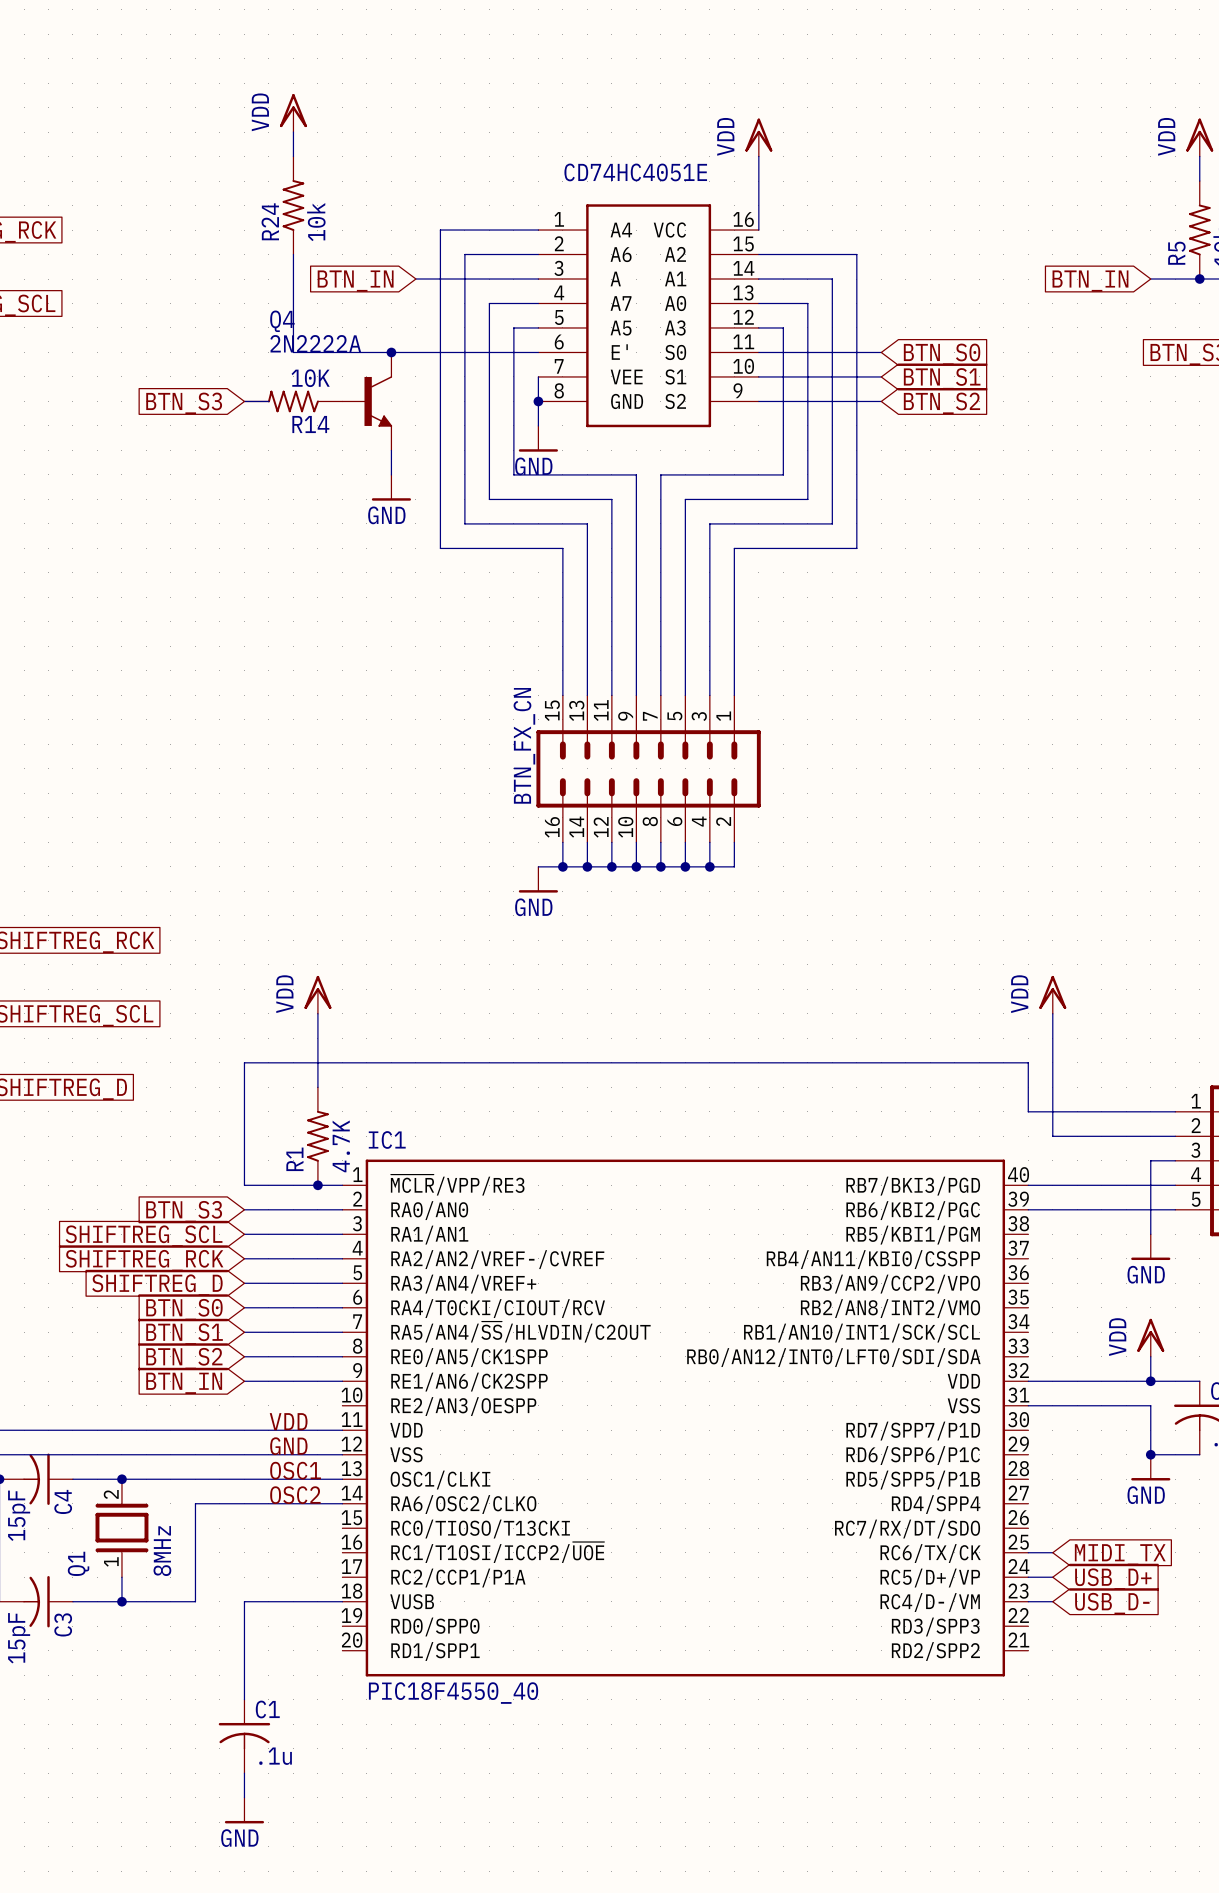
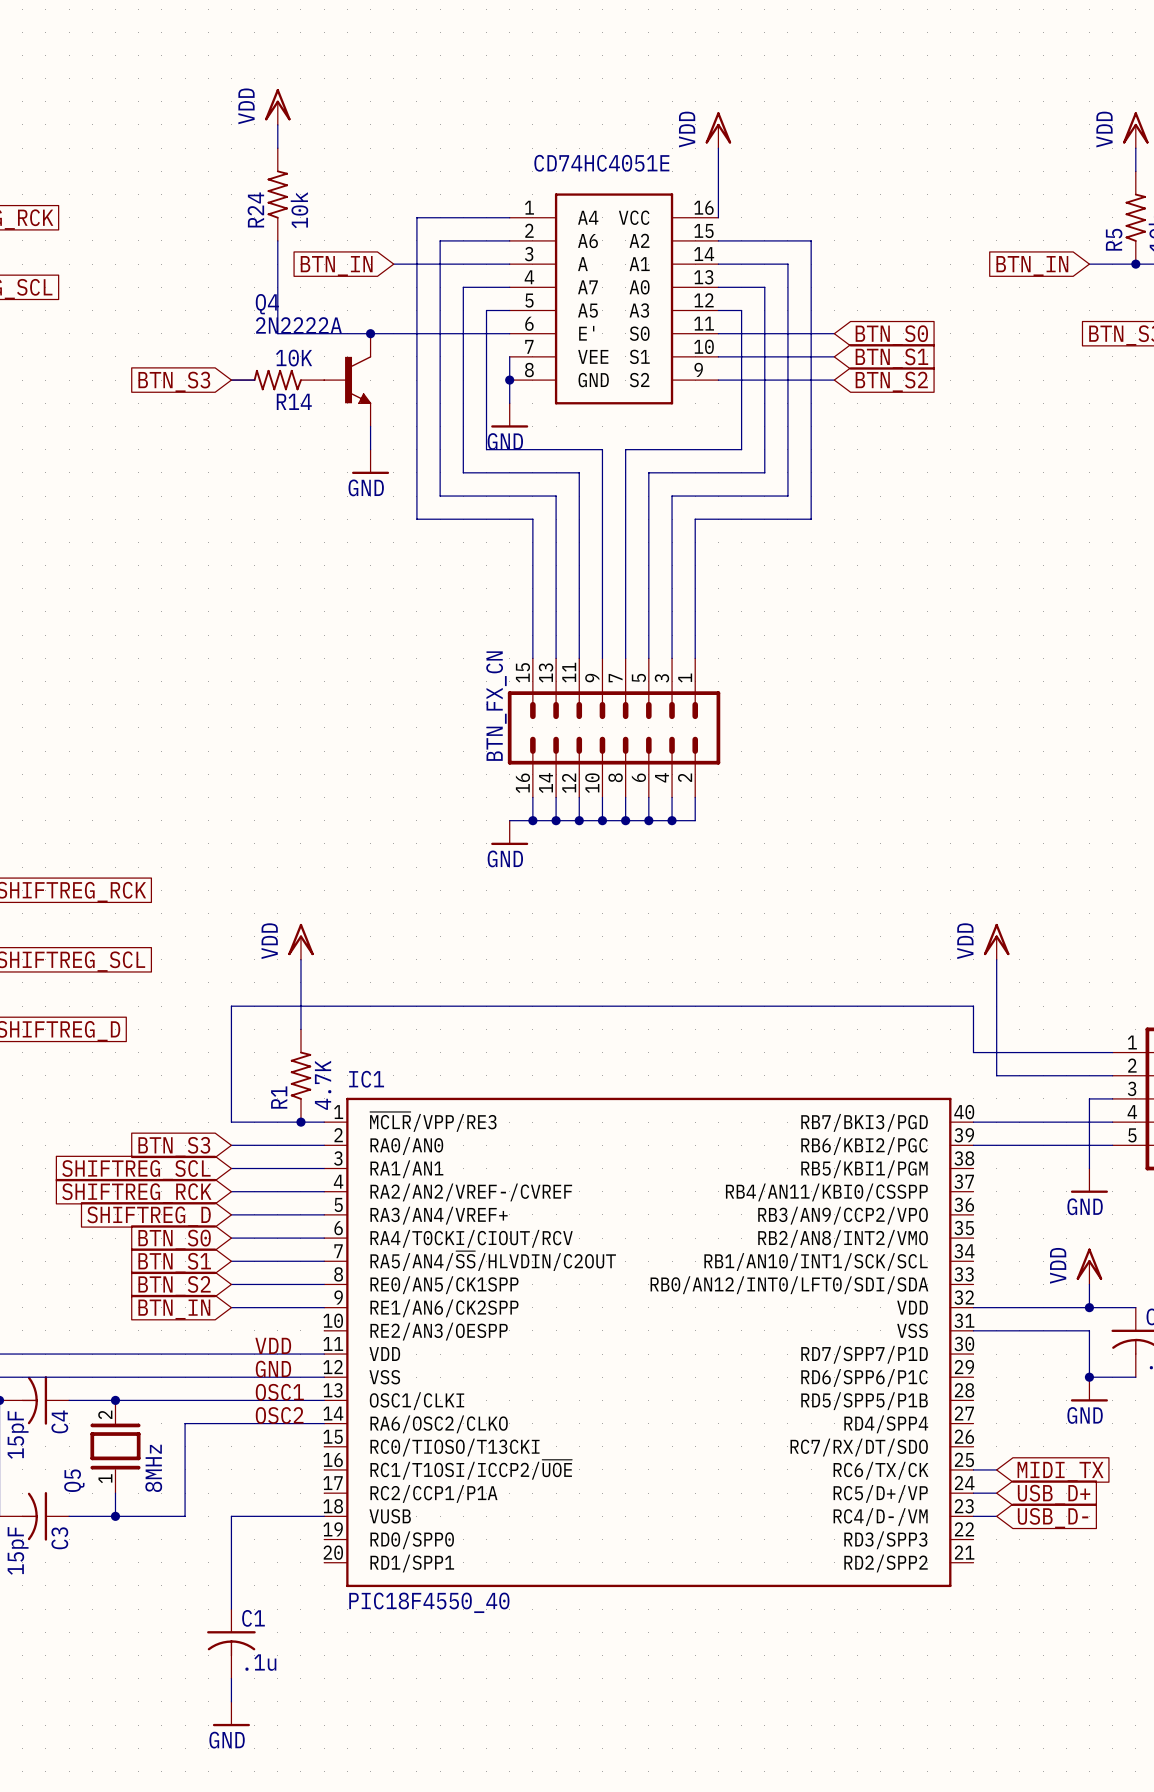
Q1 name: Q1 (78, 1563) -> Q5 (74, 1480)

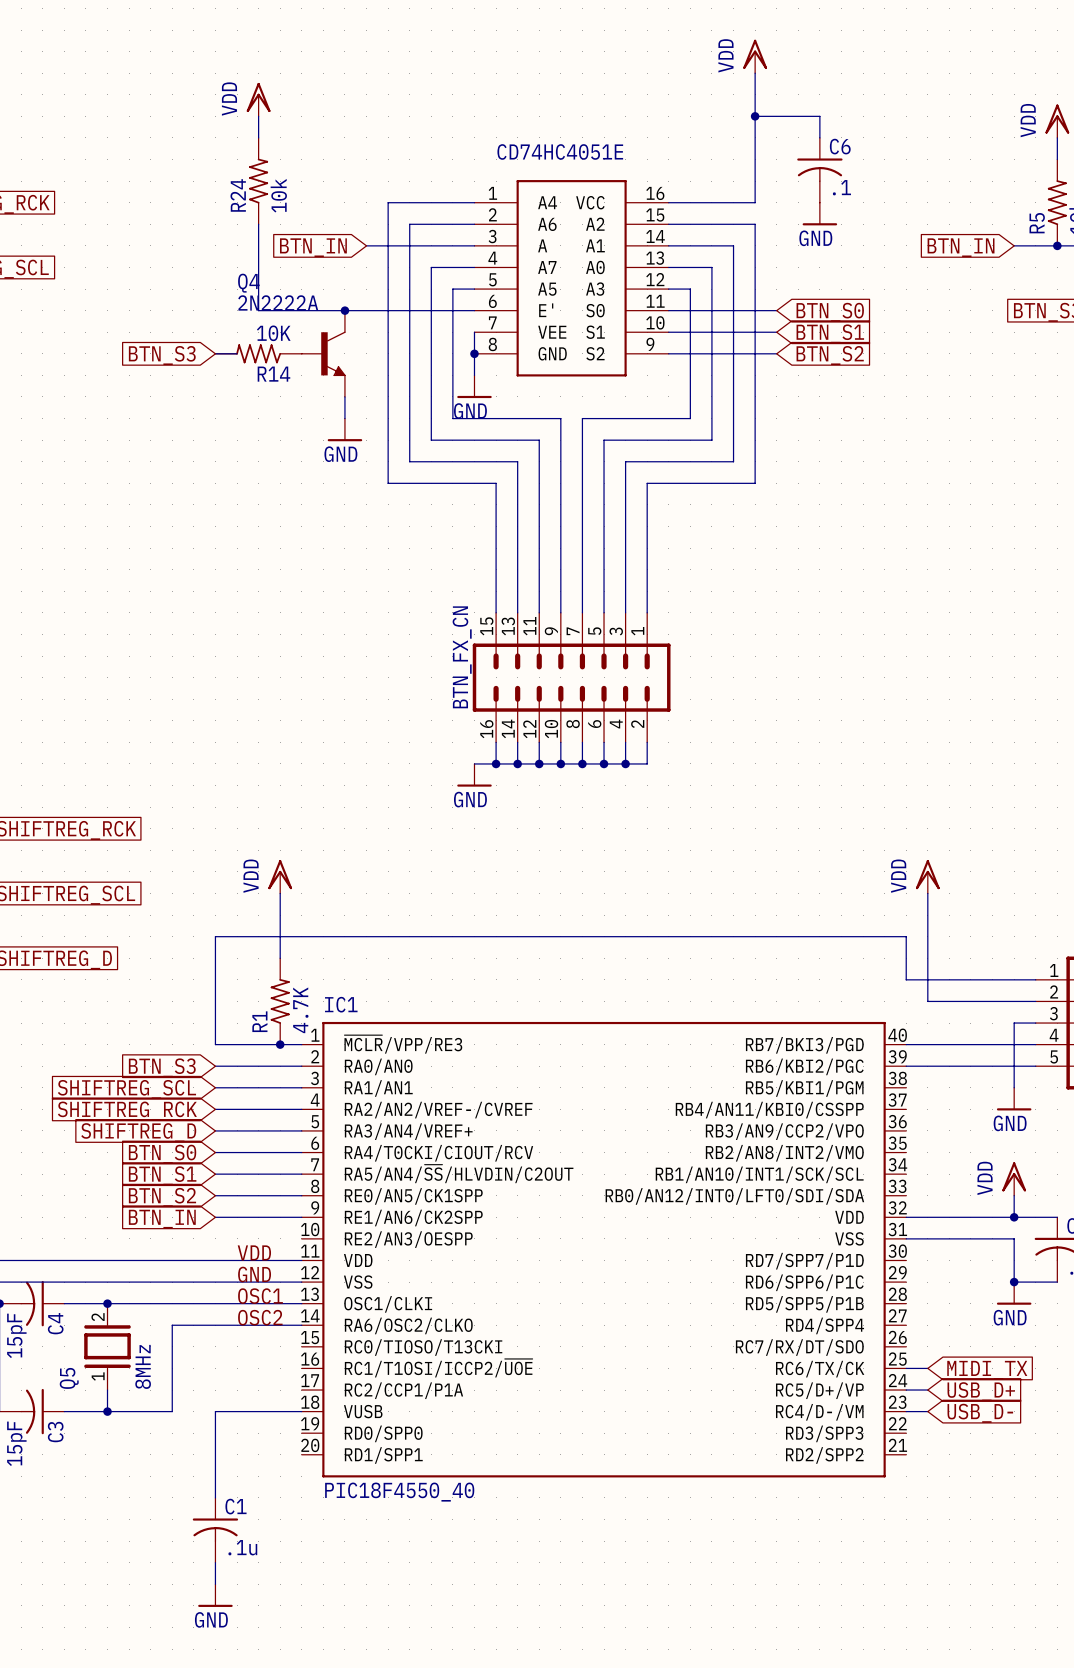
wire: none -> (755, 116) (819, 116) (819, 137)
junction: none -> (755, 116)
power symbol position: VDD (718, 130) -> VDD (755, 56)
wire: (718, 148) (718, 217) -> (755, 73) (755, 202) (668, 202)
C6: none -> .1 (819, 170)
power symbol: none -> GND (819, 214)

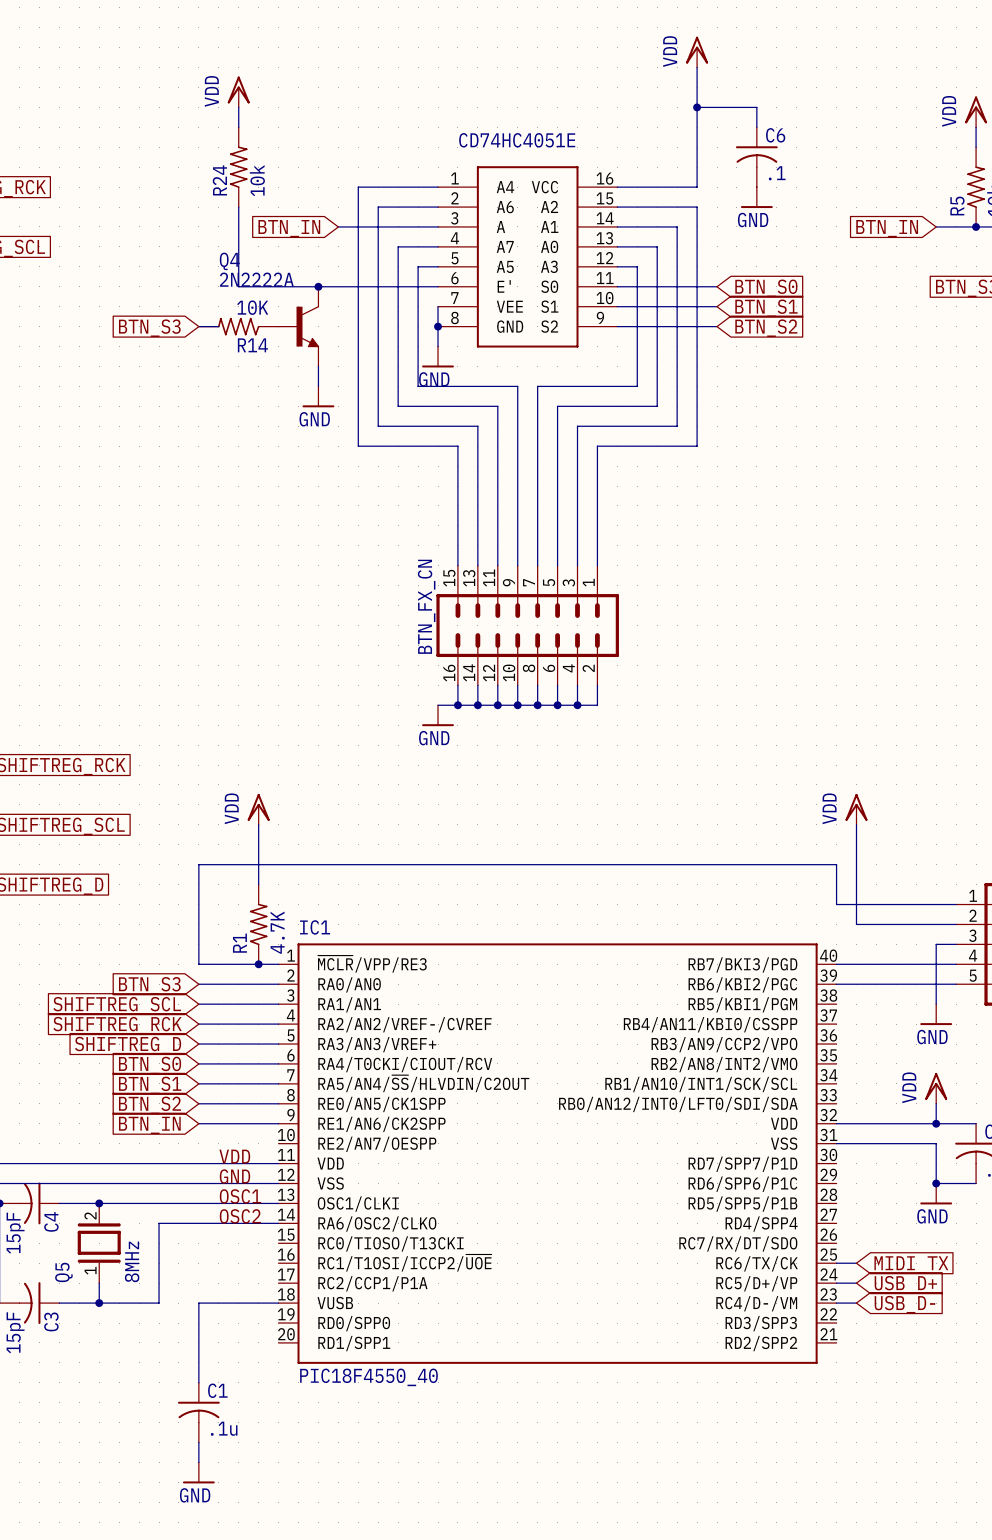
IC1 pin name: RA3/AN4/VREF+ (408, 1131) -> RA3/AN3/VREF+ (377, 1044)
IC1 pin name: RE2/AN3/OESPP (408, 1239) -> RE2/AN7/OESPP (377, 1144)

